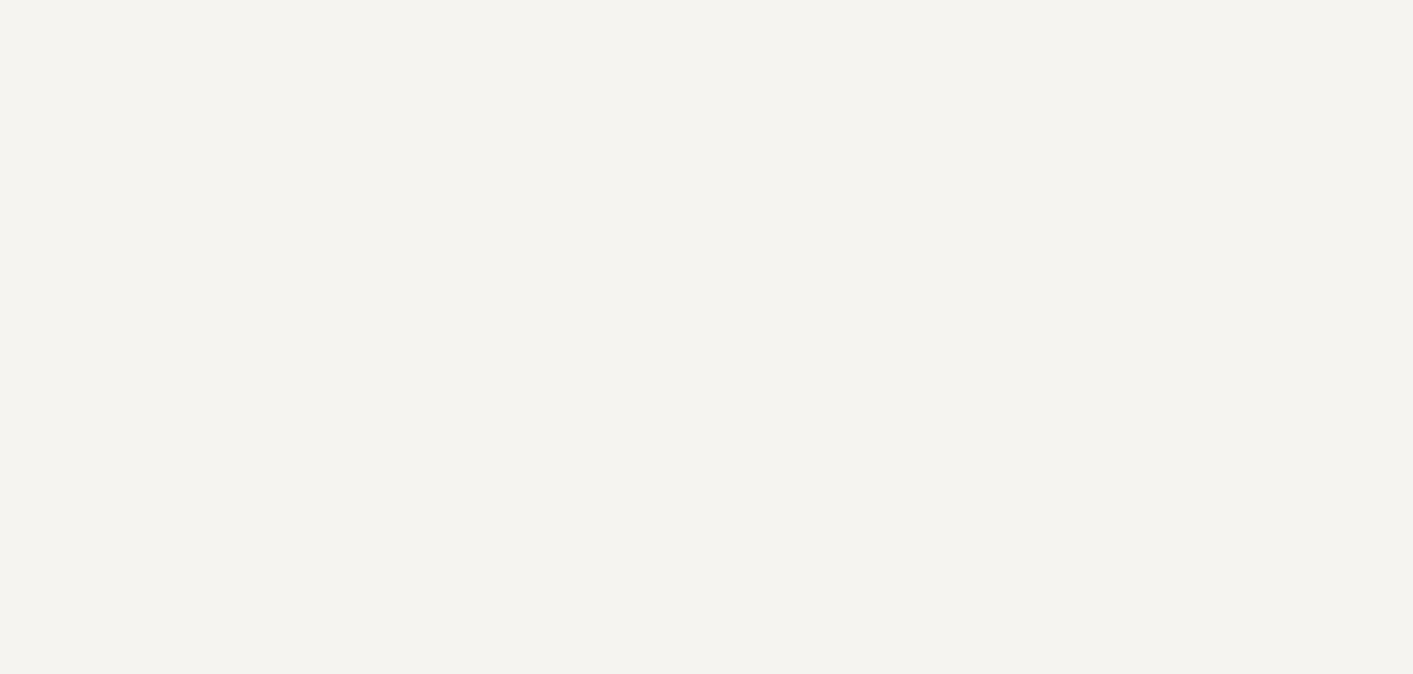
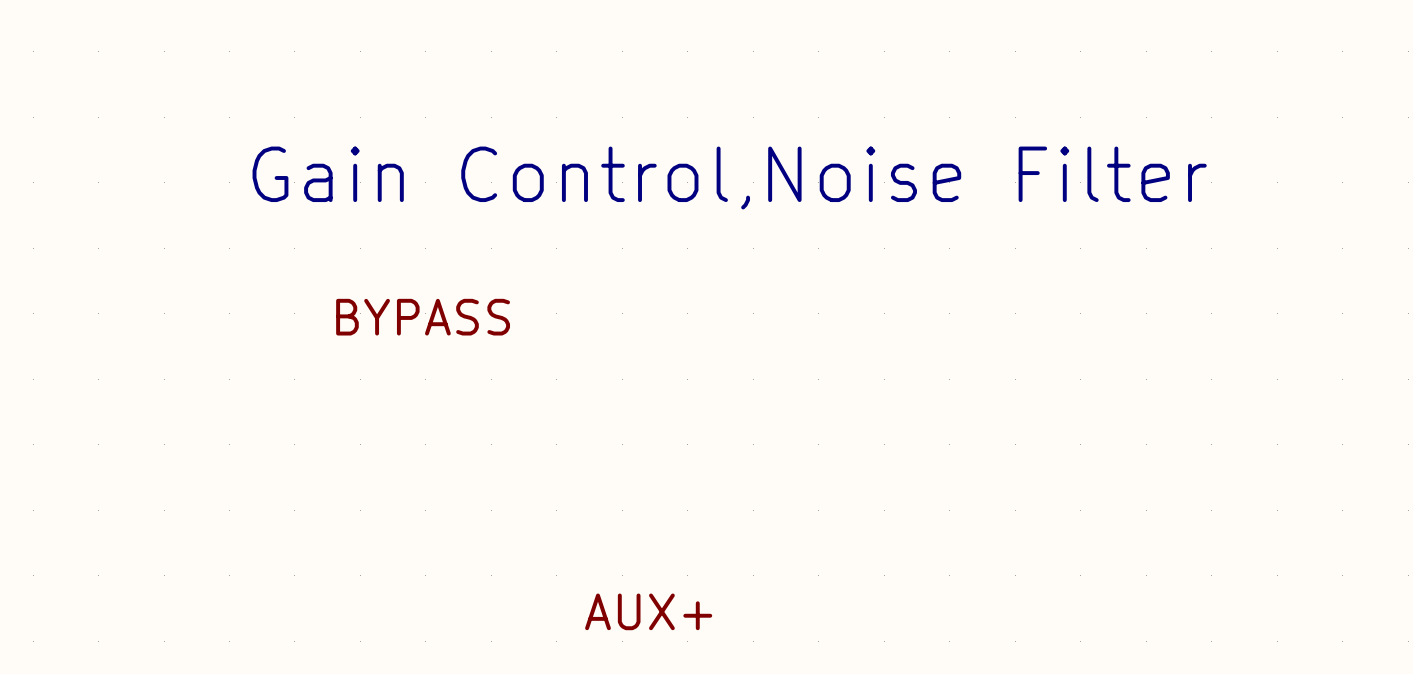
text: none -> Gain Control,Noise Filter (729, 177)
label: none -> BYPASS (423, 317)
label: none -> AUX+ (648, 611)

